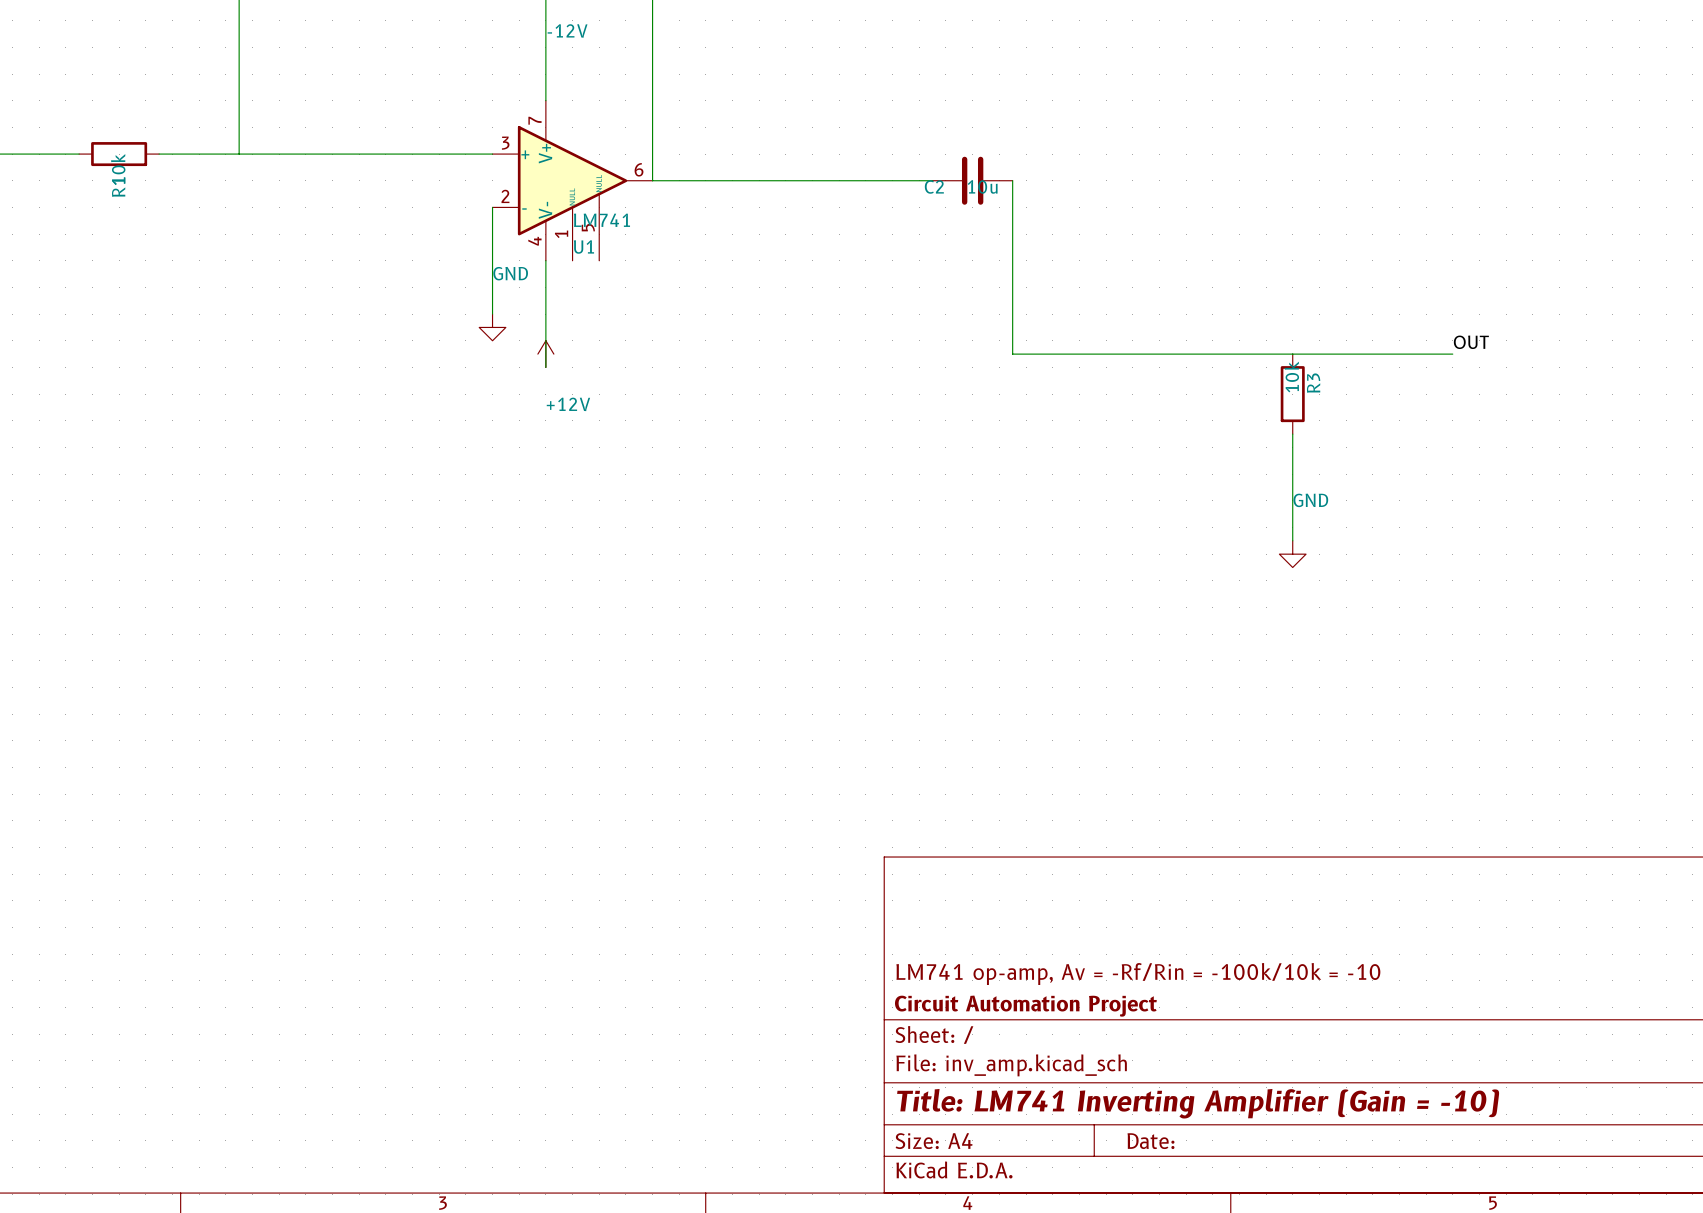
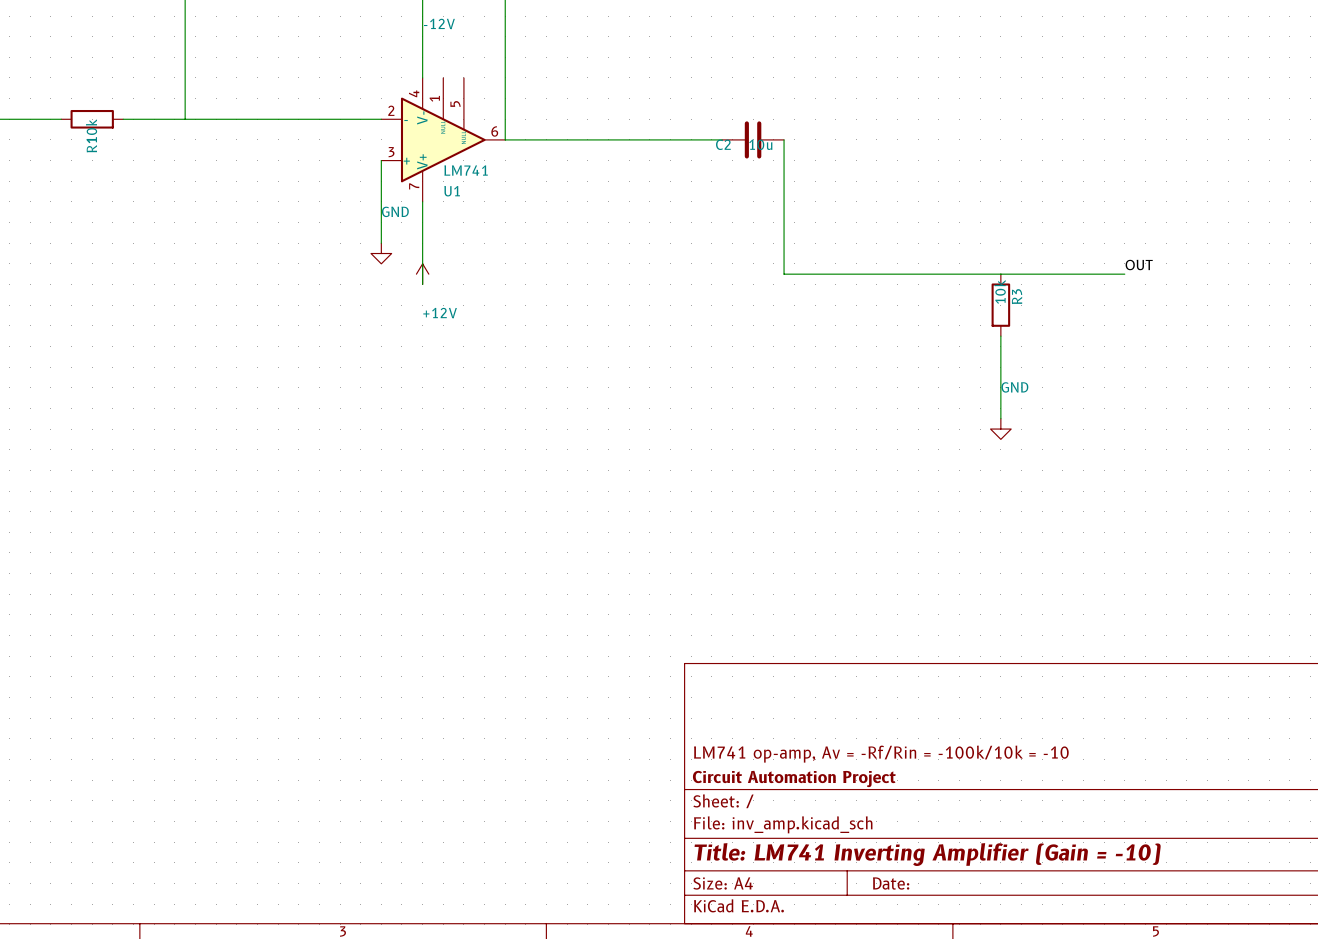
U1 flip: as is (572, 180) -> up-down (443, 139)

